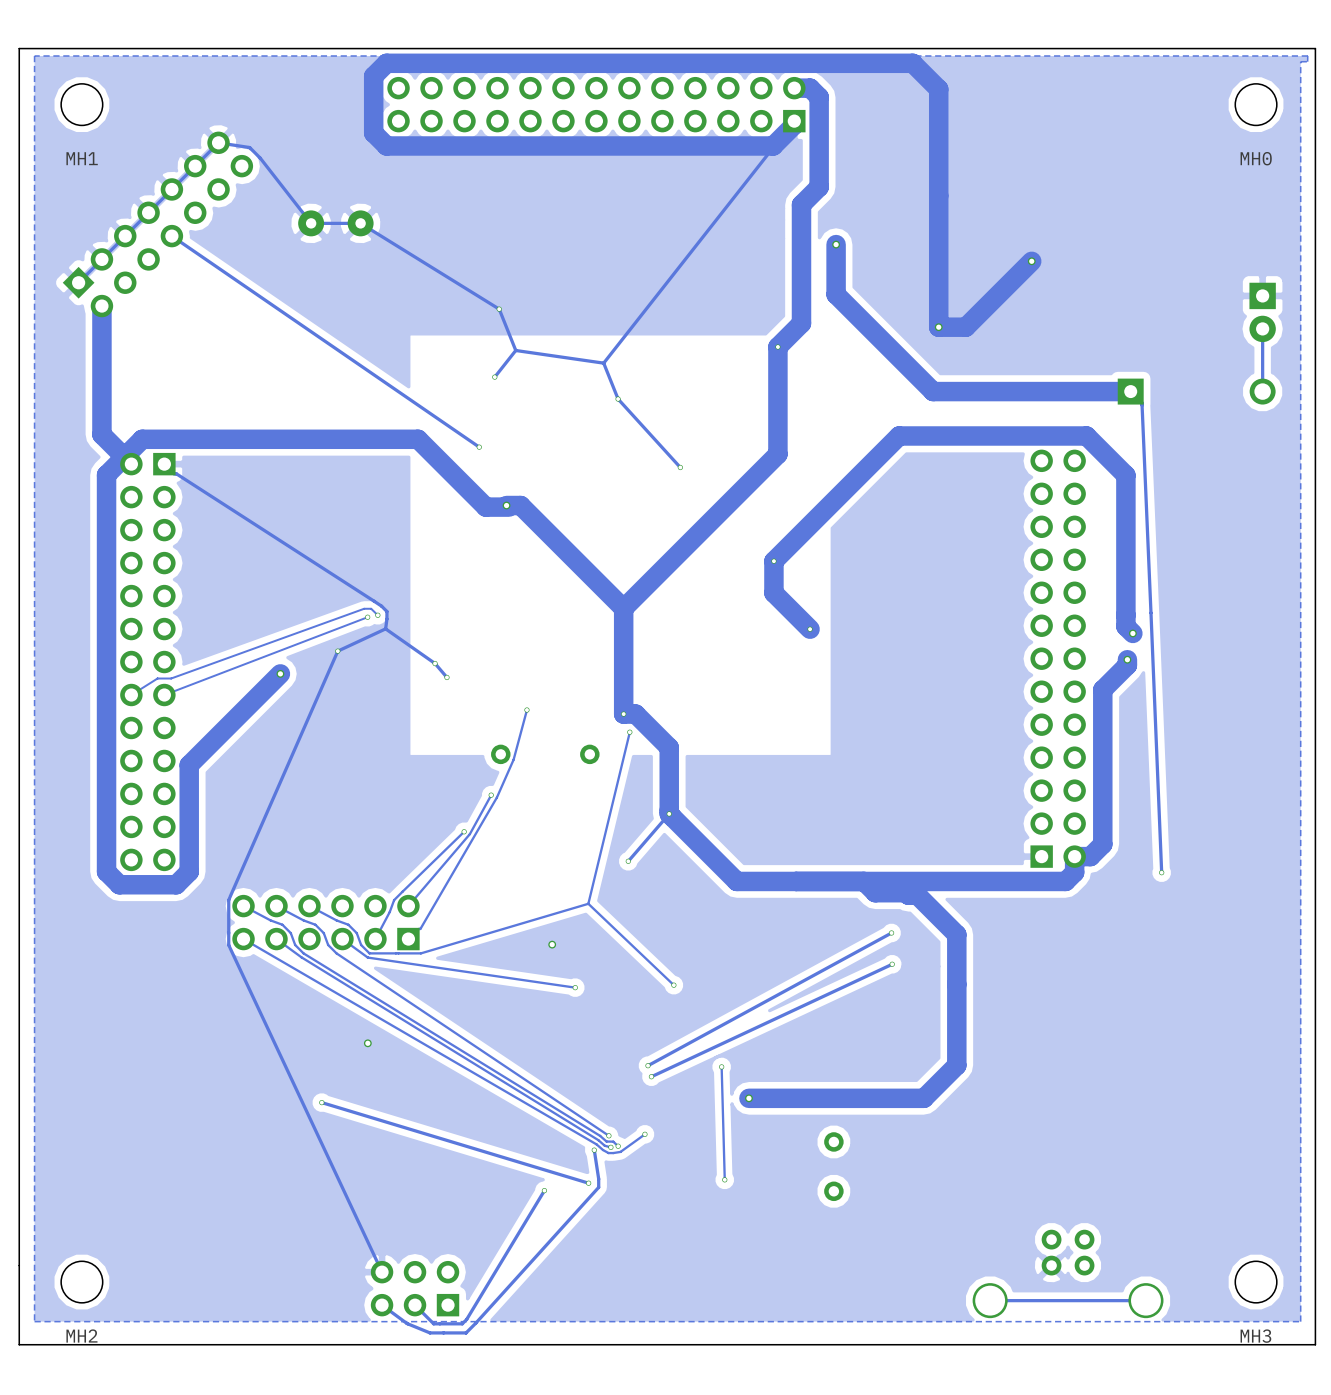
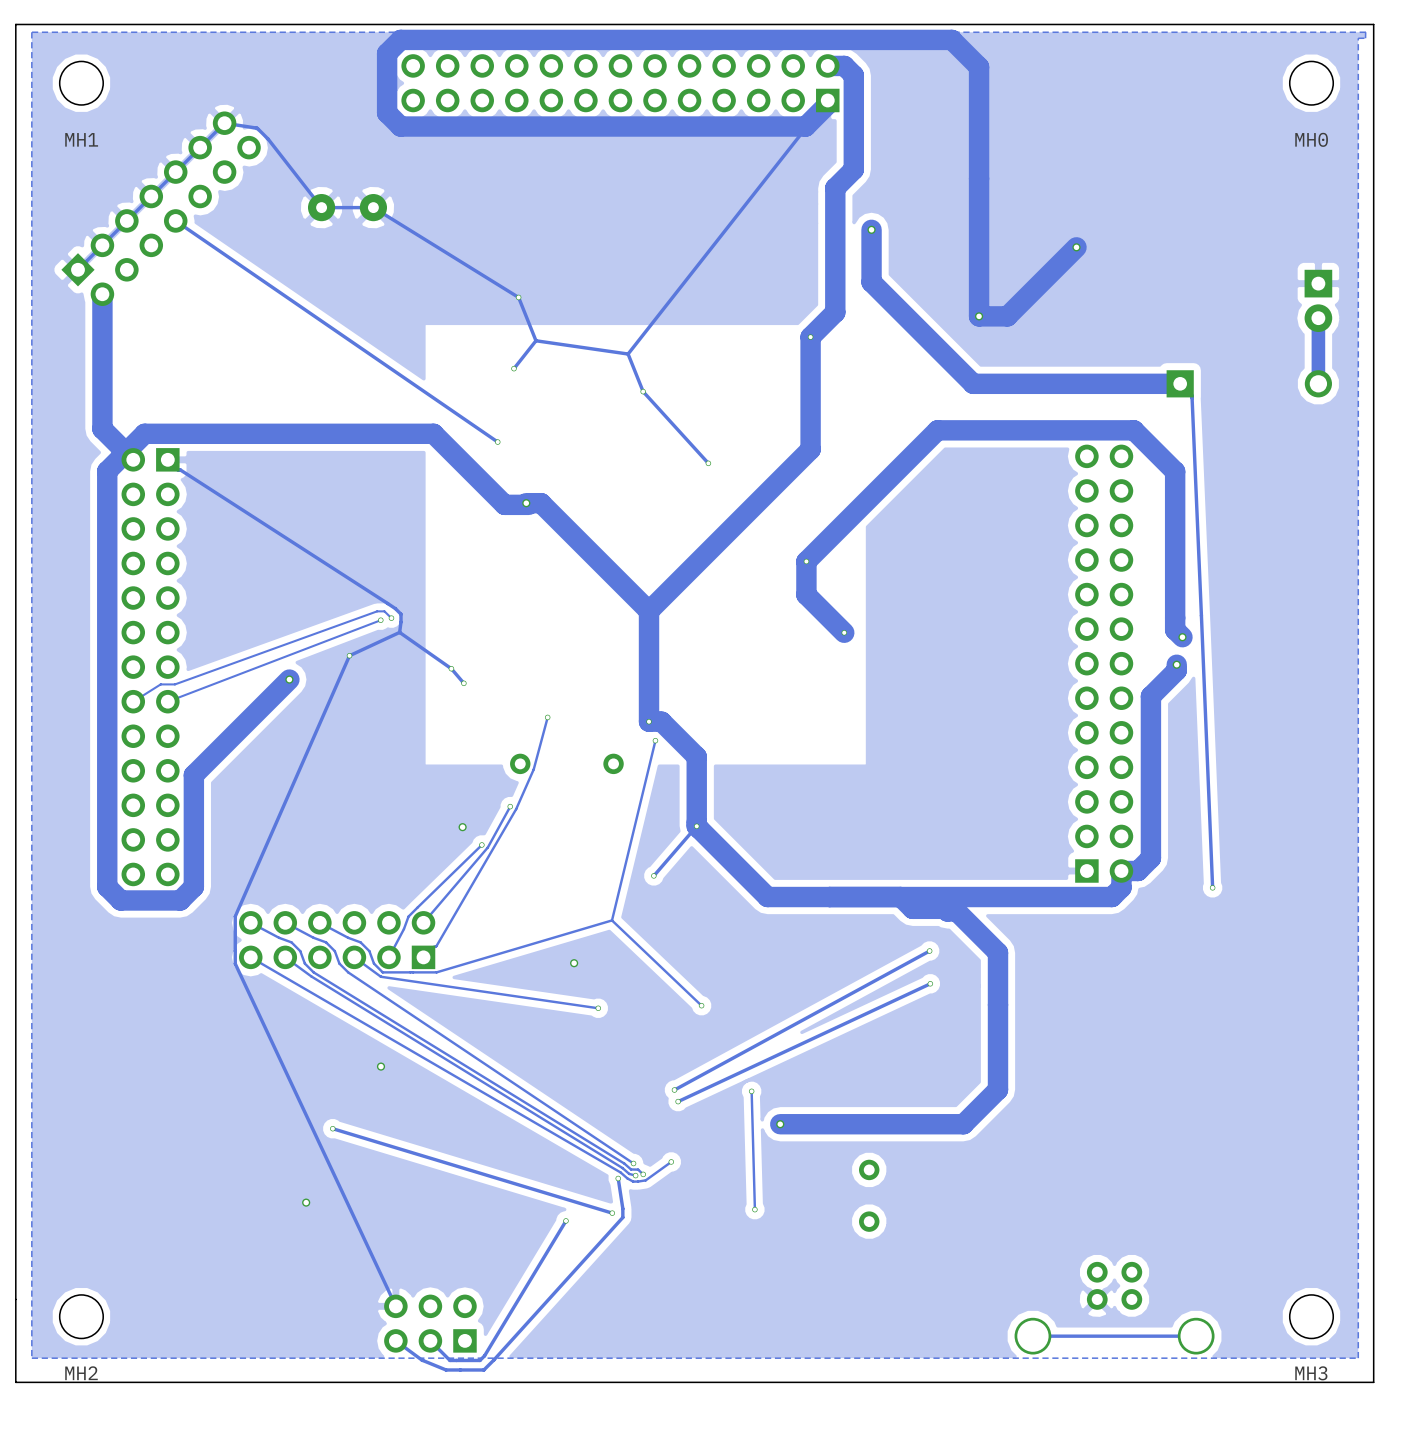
track width: thin (1262, 328) (1262, 391) -> thick (1318, 318) (1318, 383)
via: none -> (462, 827)
via: none -> (306, 1202)

